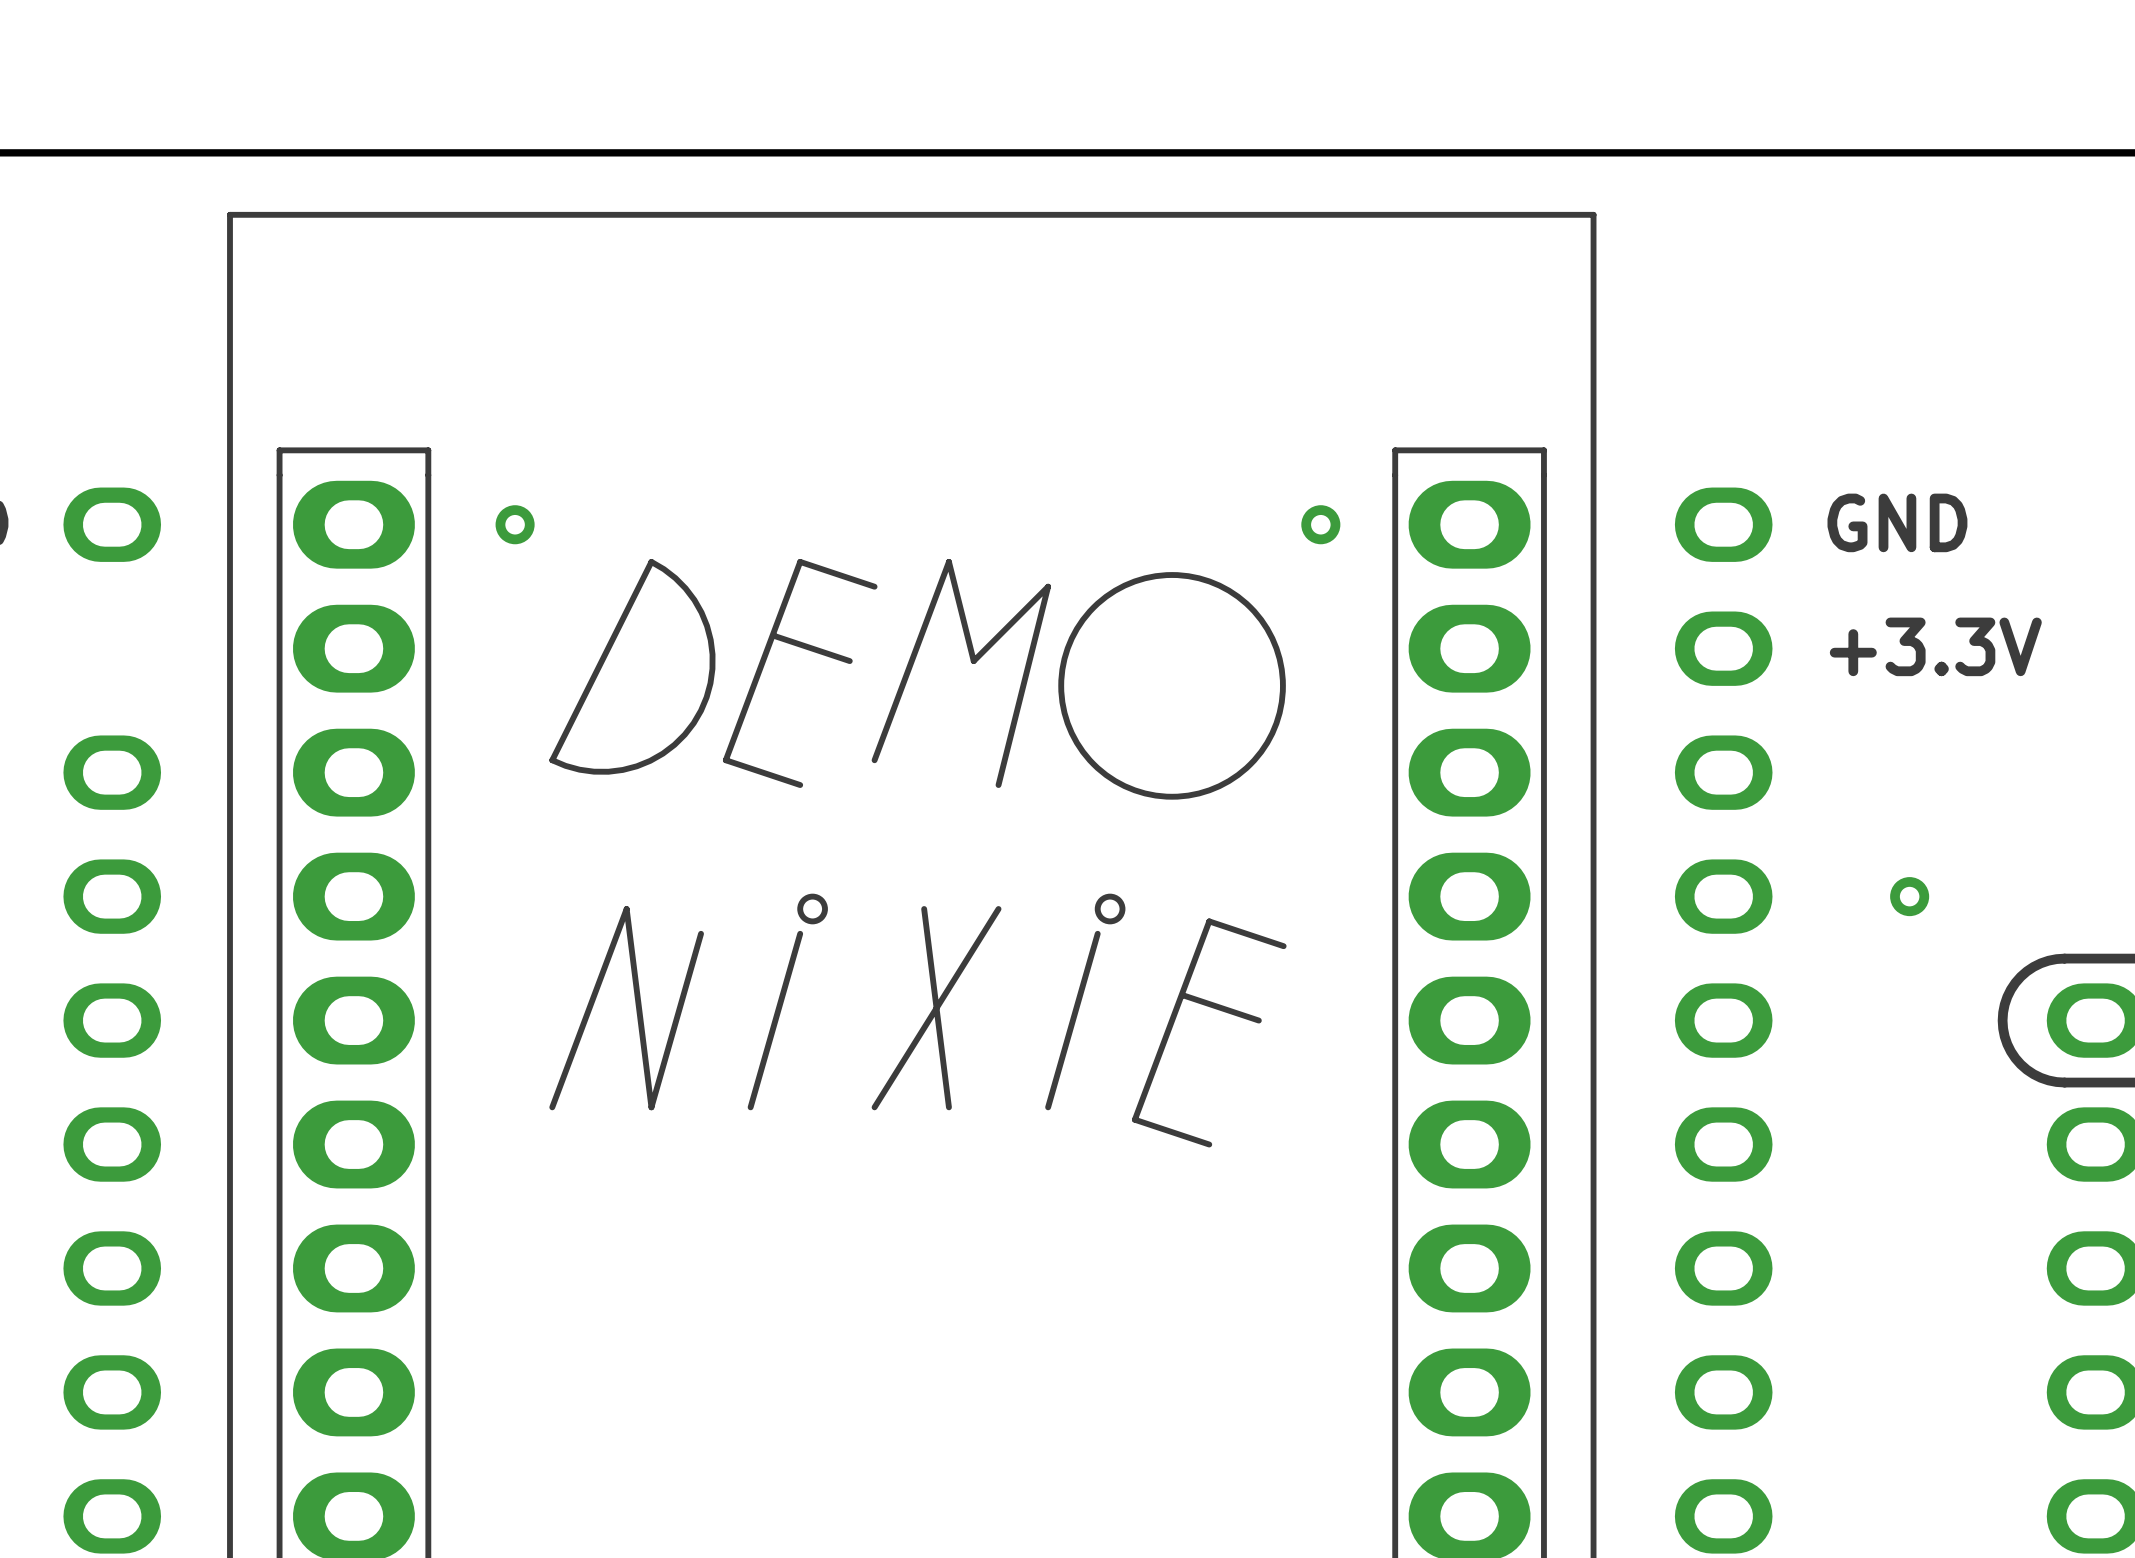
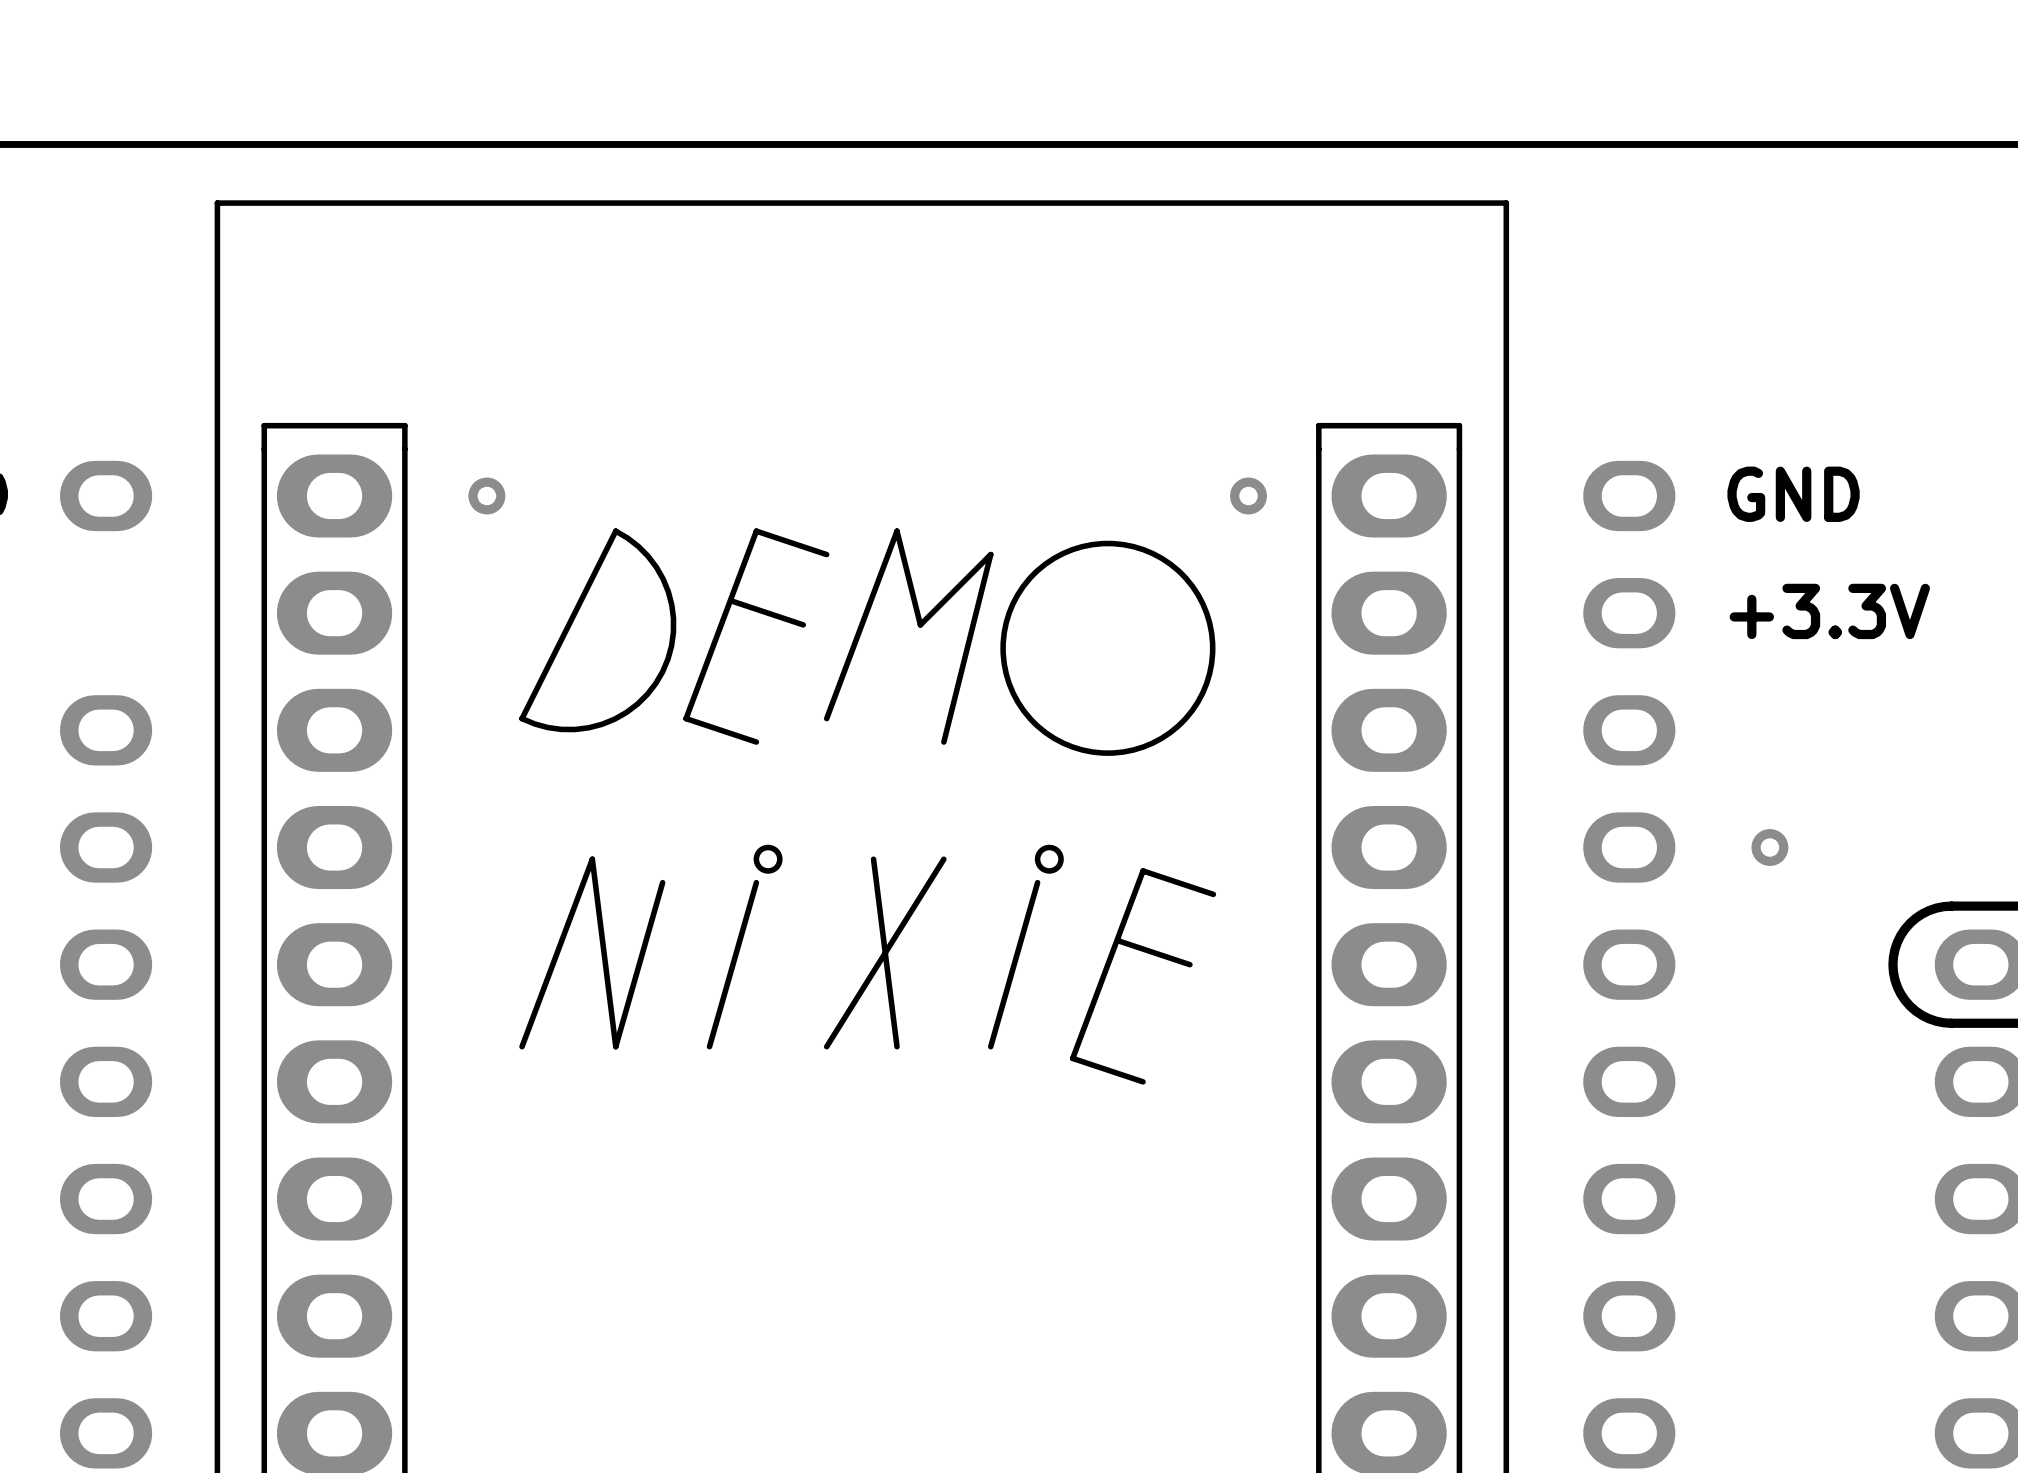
via position: (1909, 896) -> (1769, 847)

